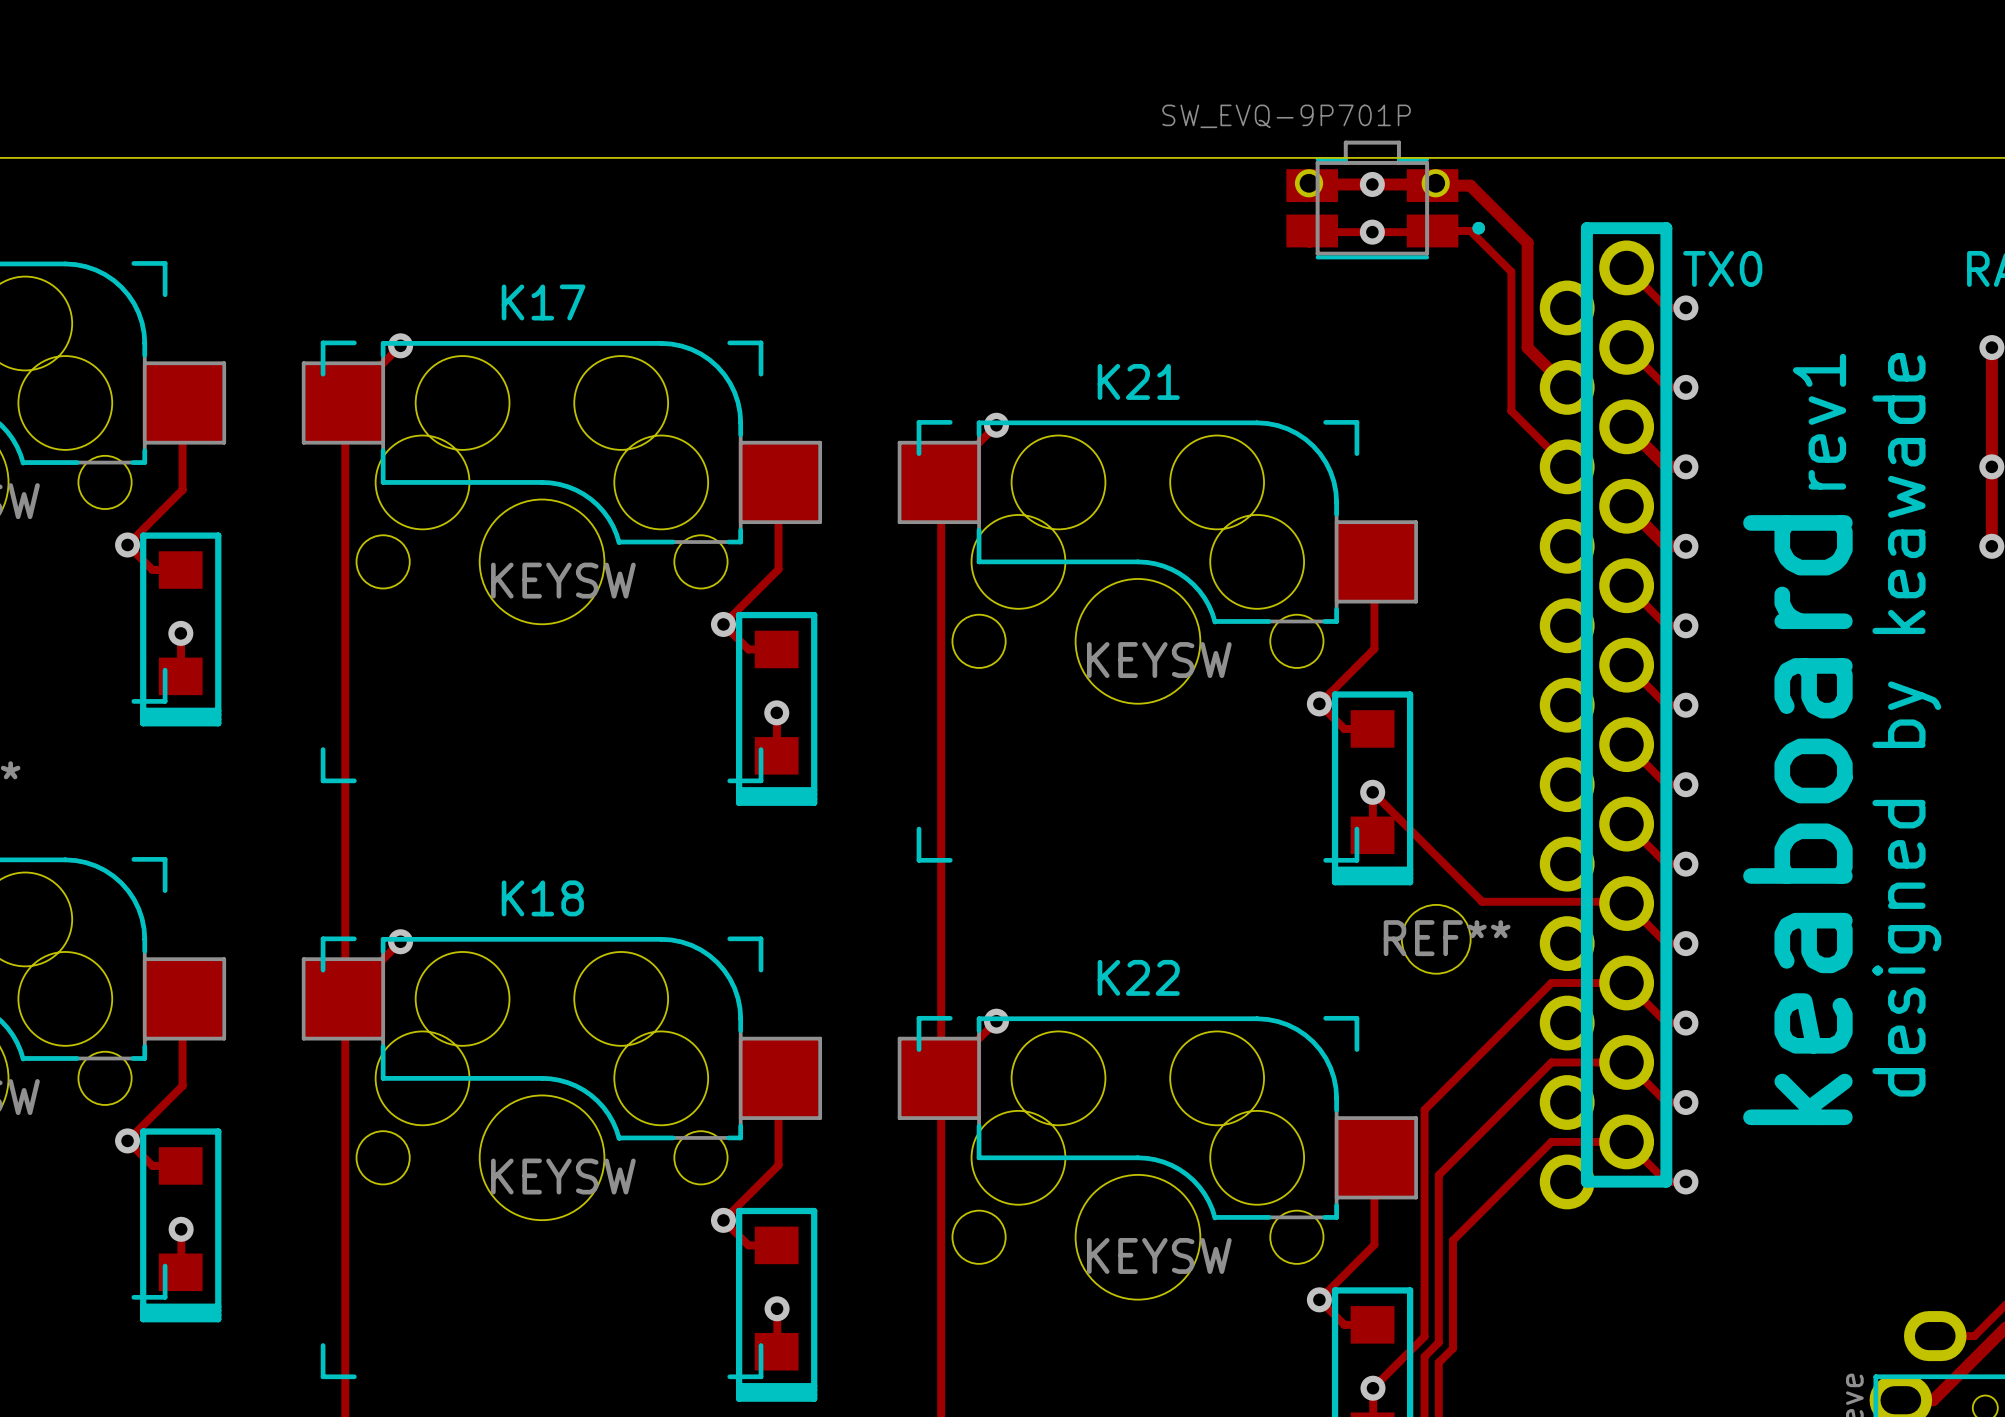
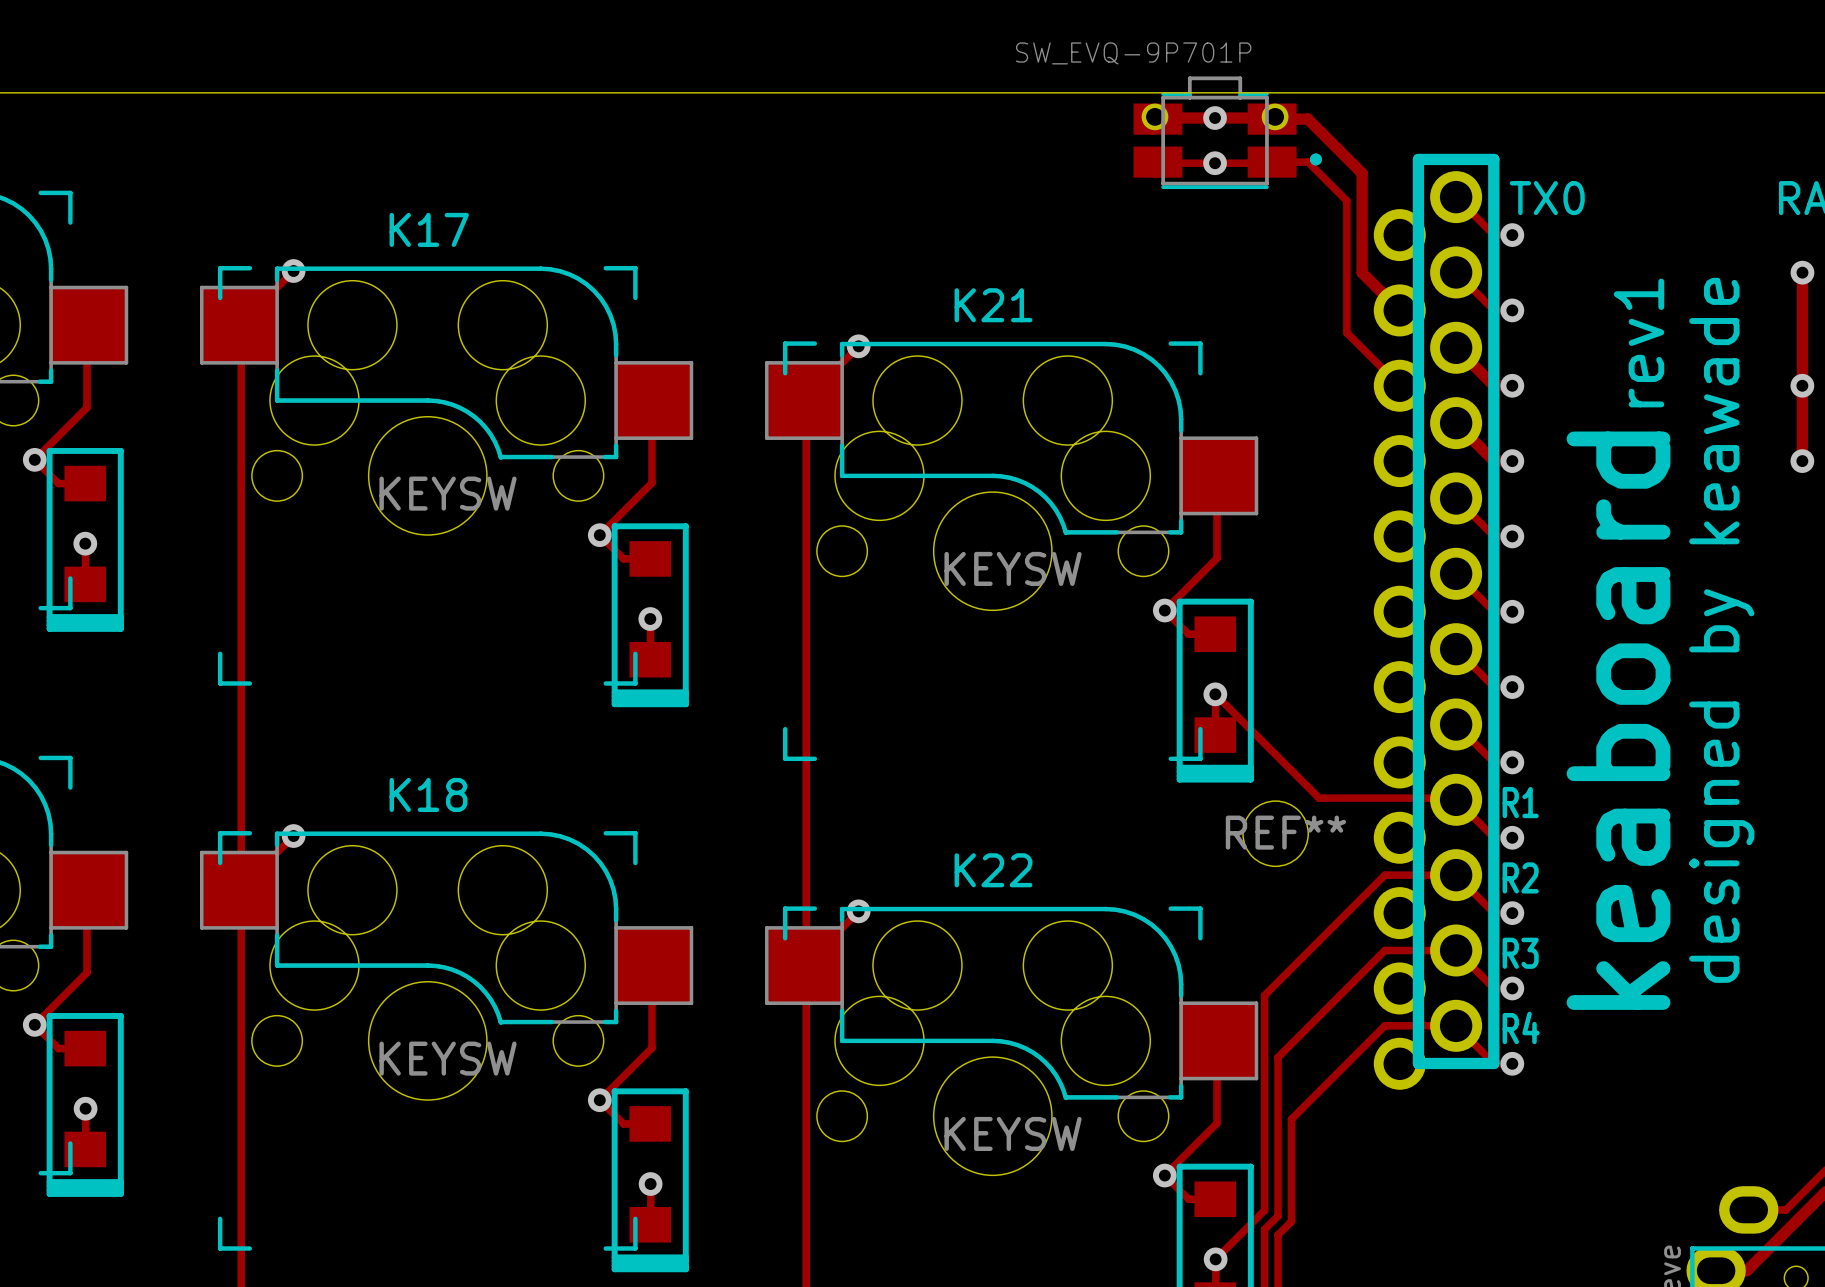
text: none -> R1 (1520, 802)
text: none -> R2 (1520, 877)
text: none -> R3 (1520, 953)
text: none -> R4 (1521, 1027)

